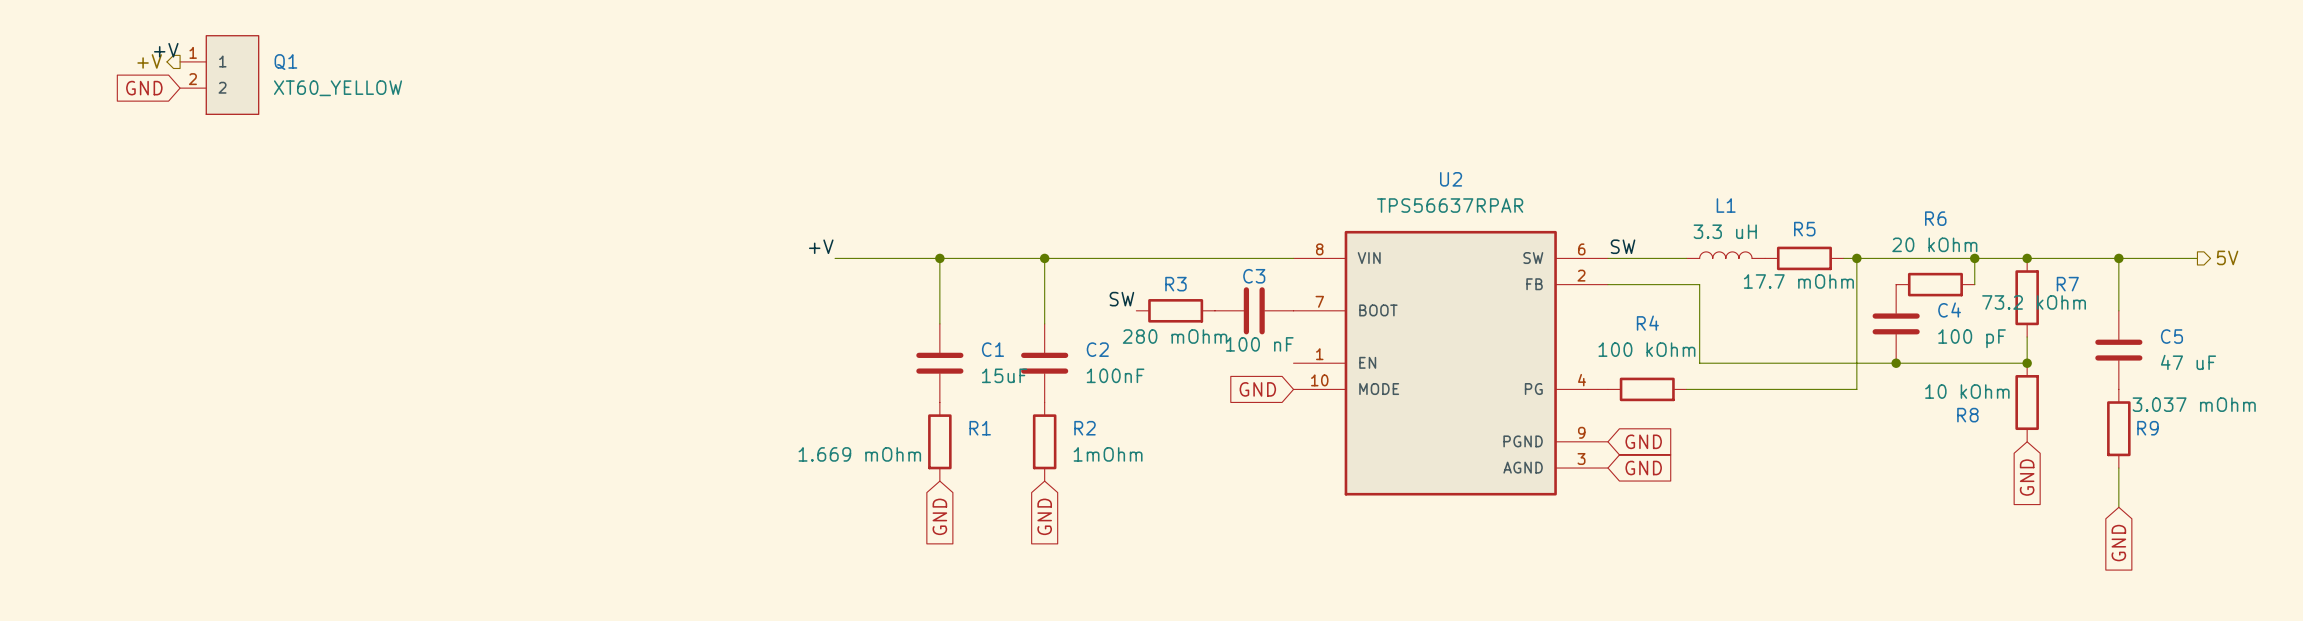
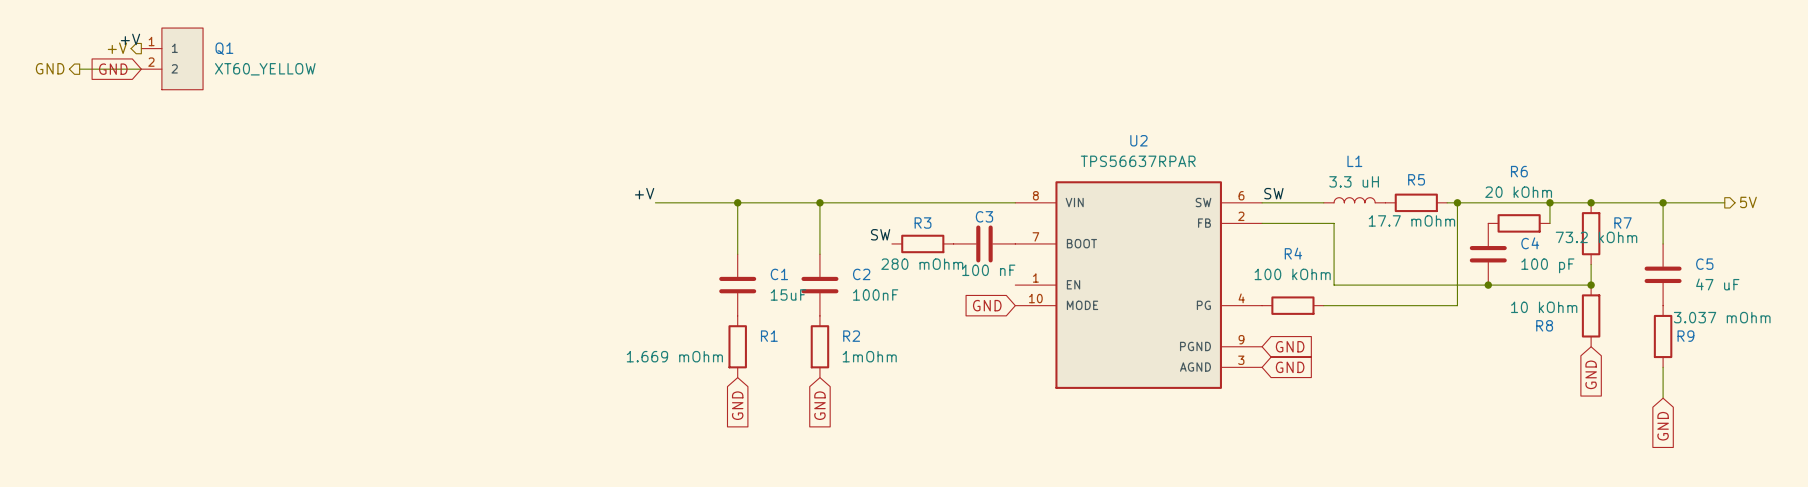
hierarchical label: none -> GND (50, 68)
wire: none -> (79, 69) (141, 69)

